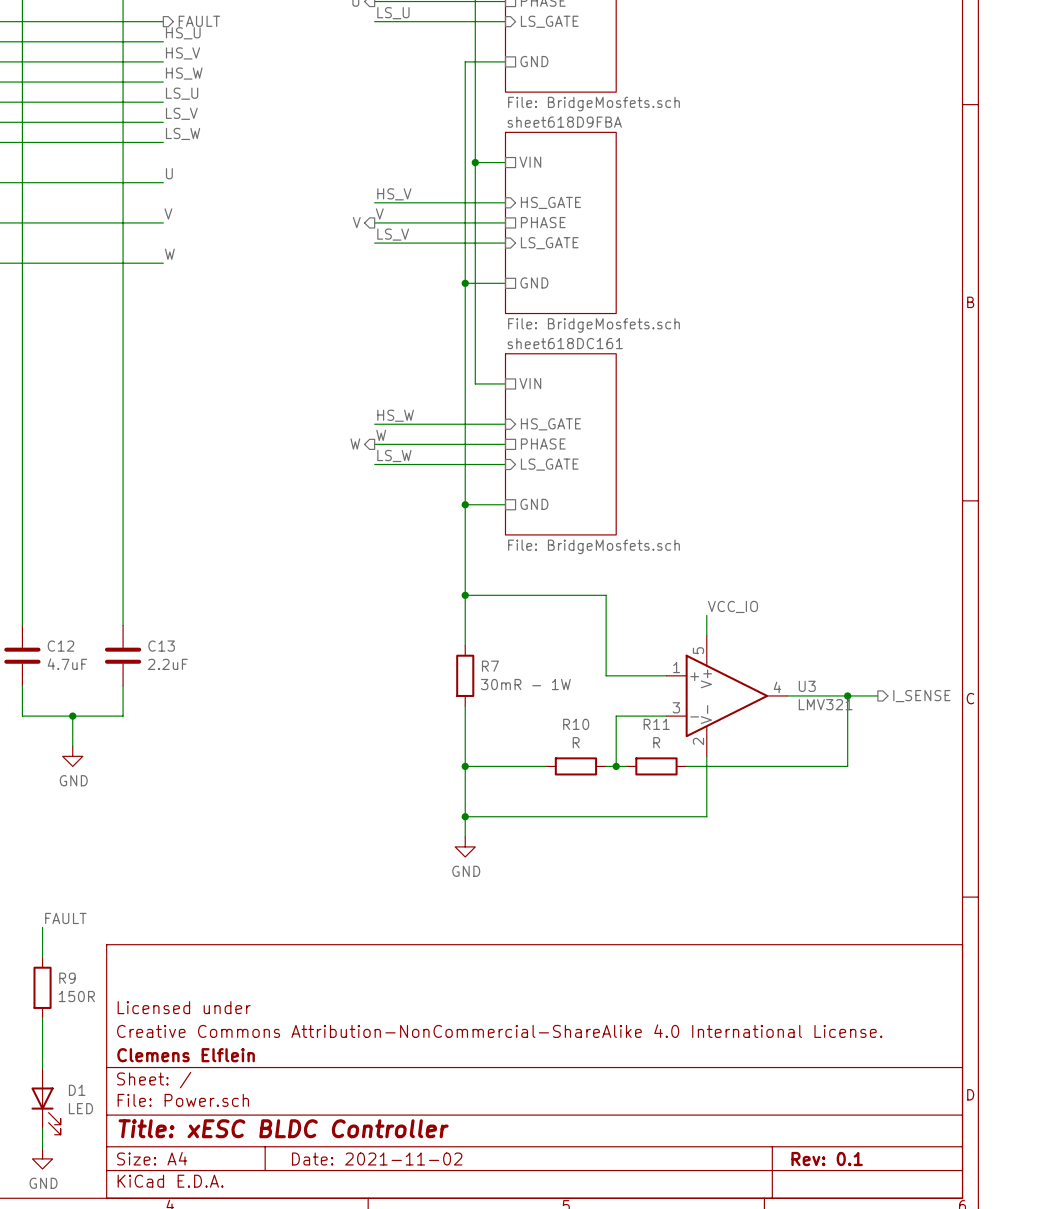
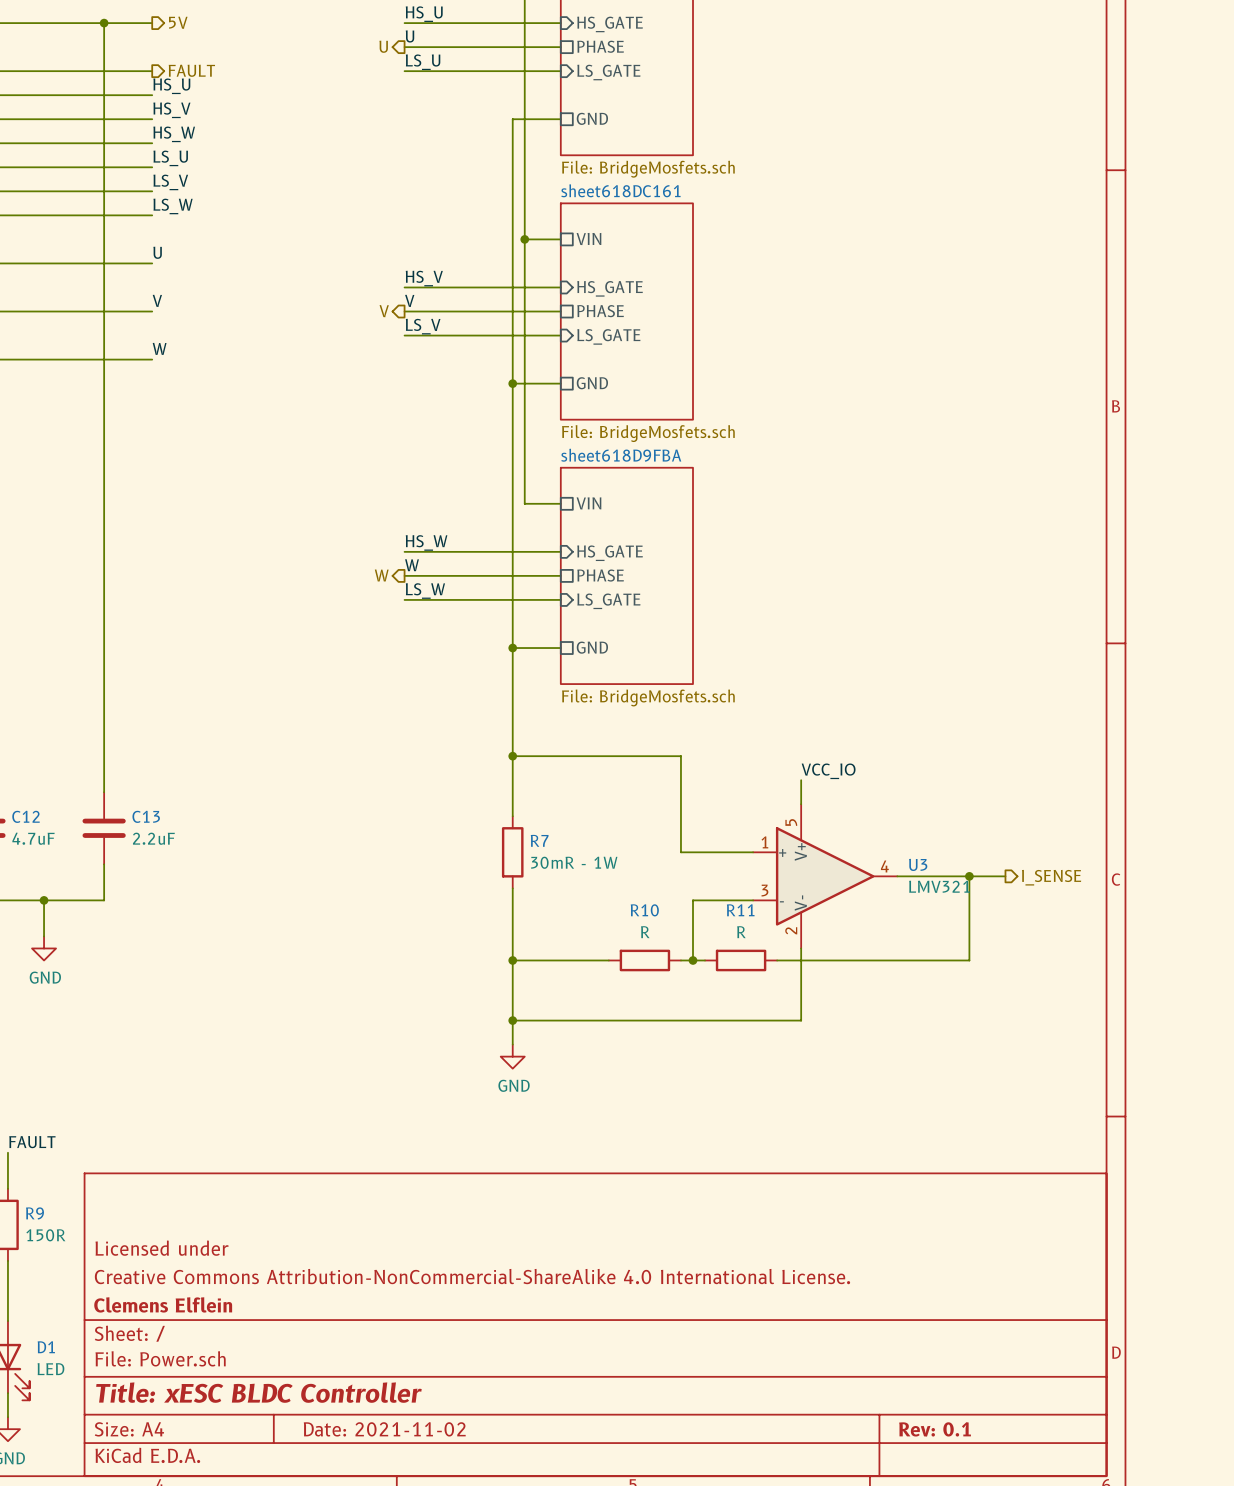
sheet sheet618D9FBA name: sheet618D9FBA (564, 122) -> sheet618DC161 (620, 190)
sheet sheet618DC161 name: sheet618DC161 (565, 343) -> sheet618D9FBA (621, 455)

